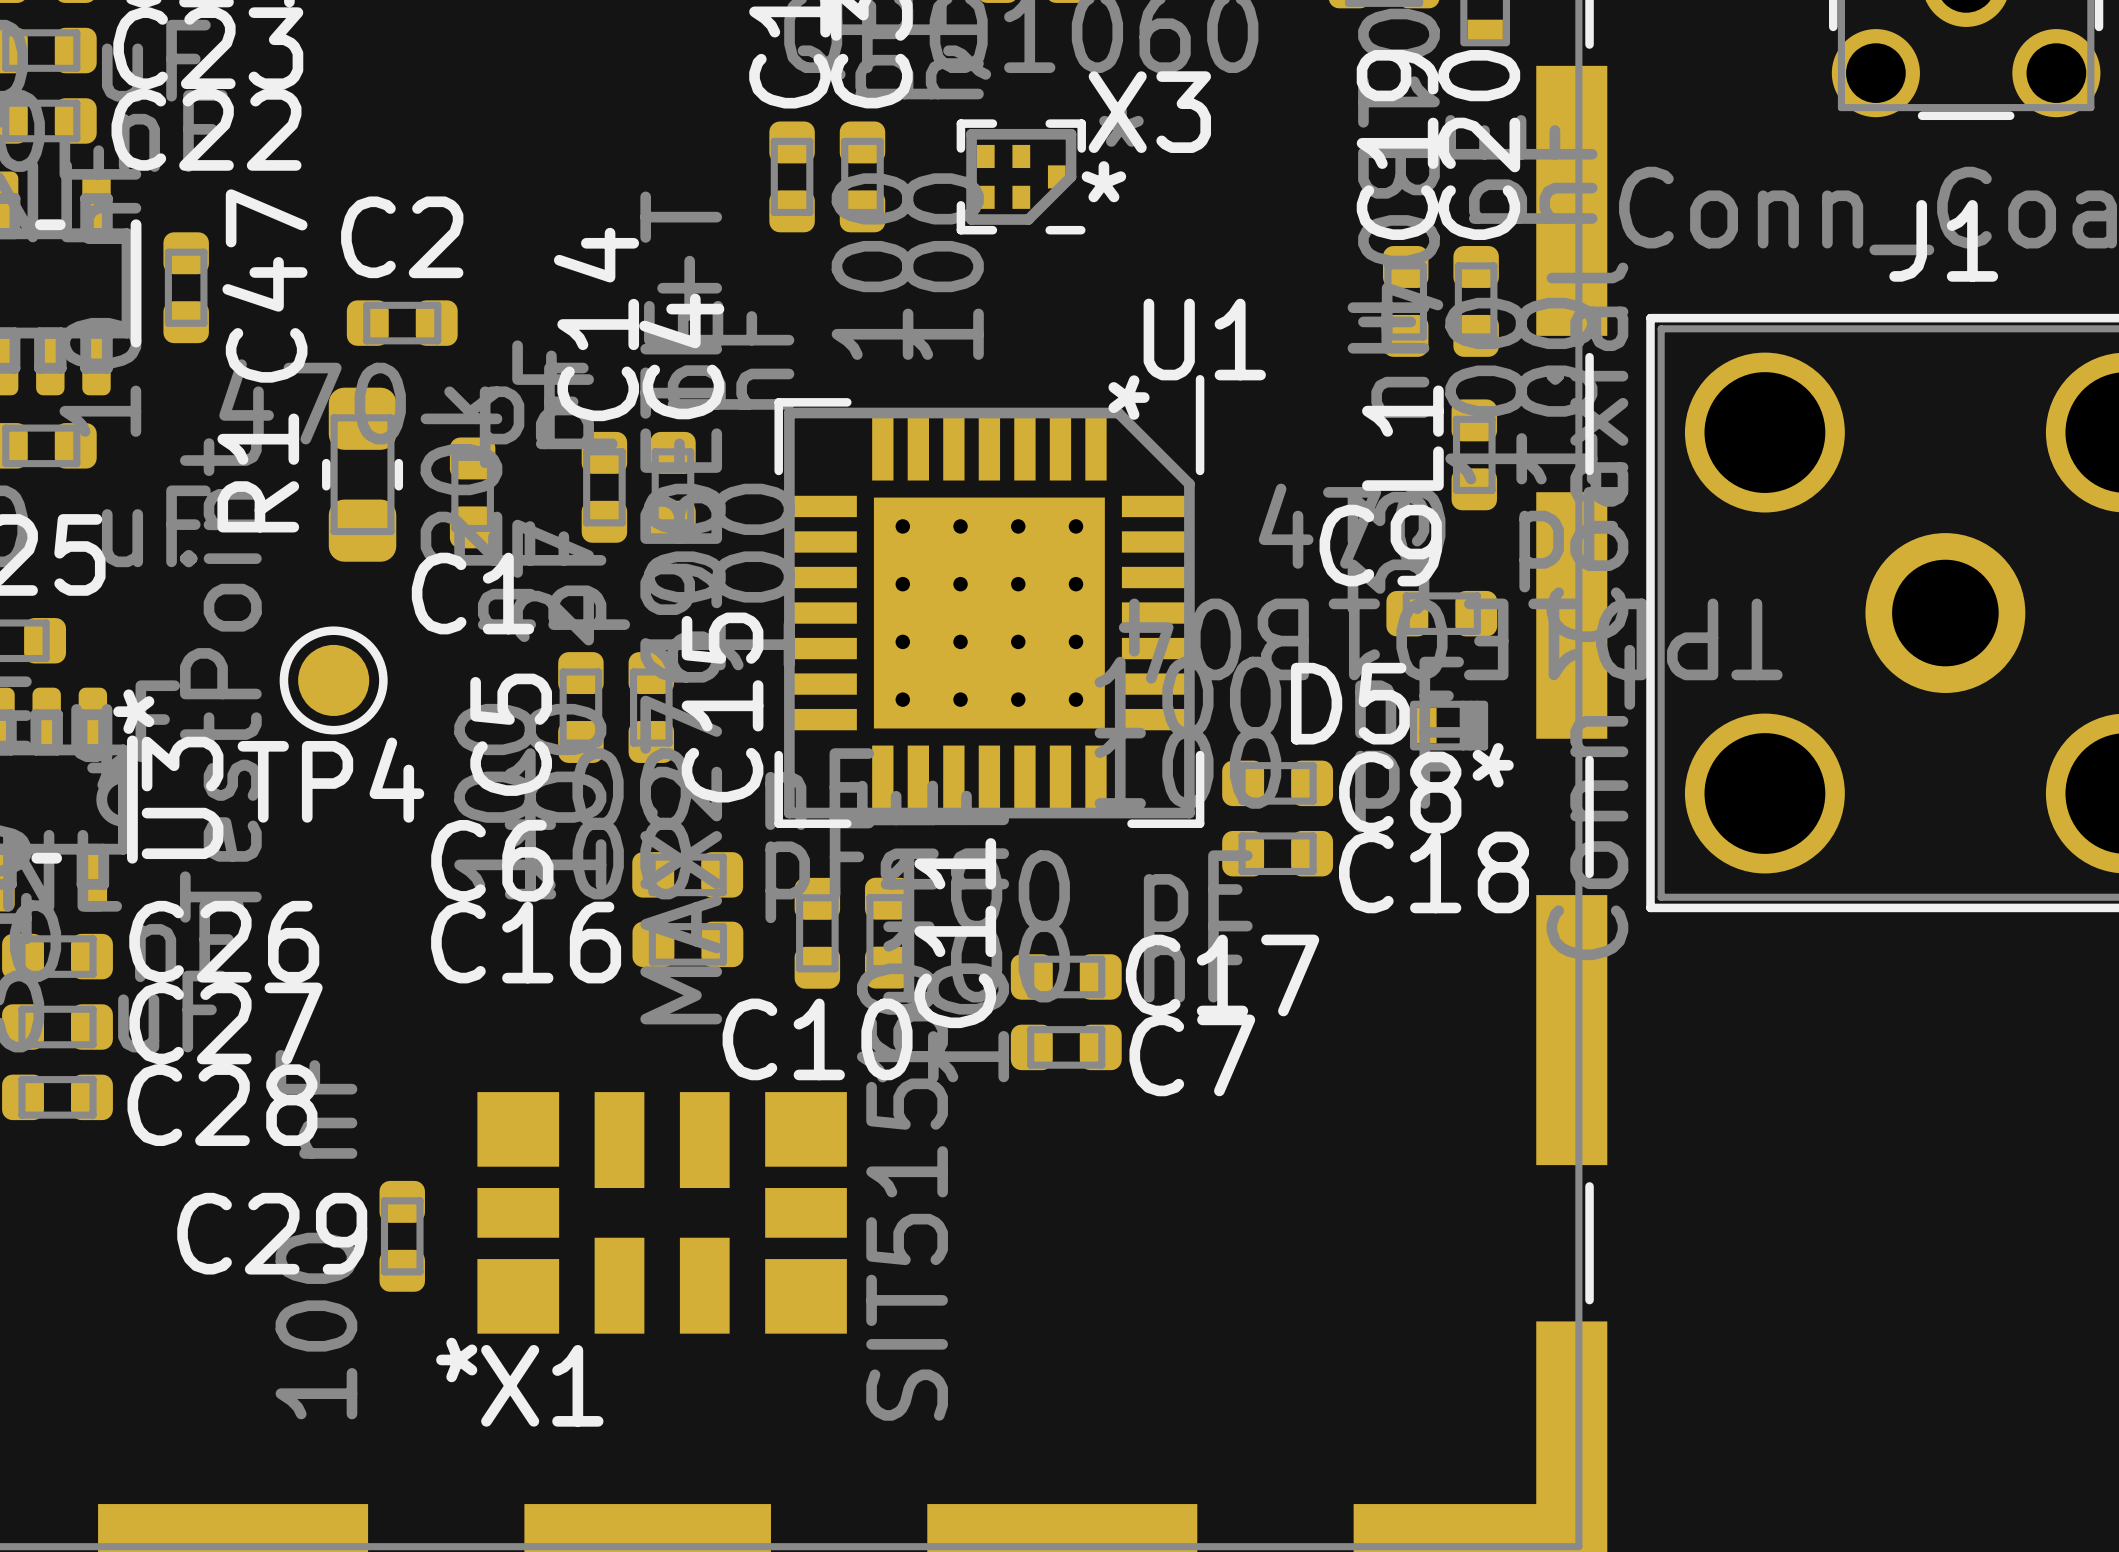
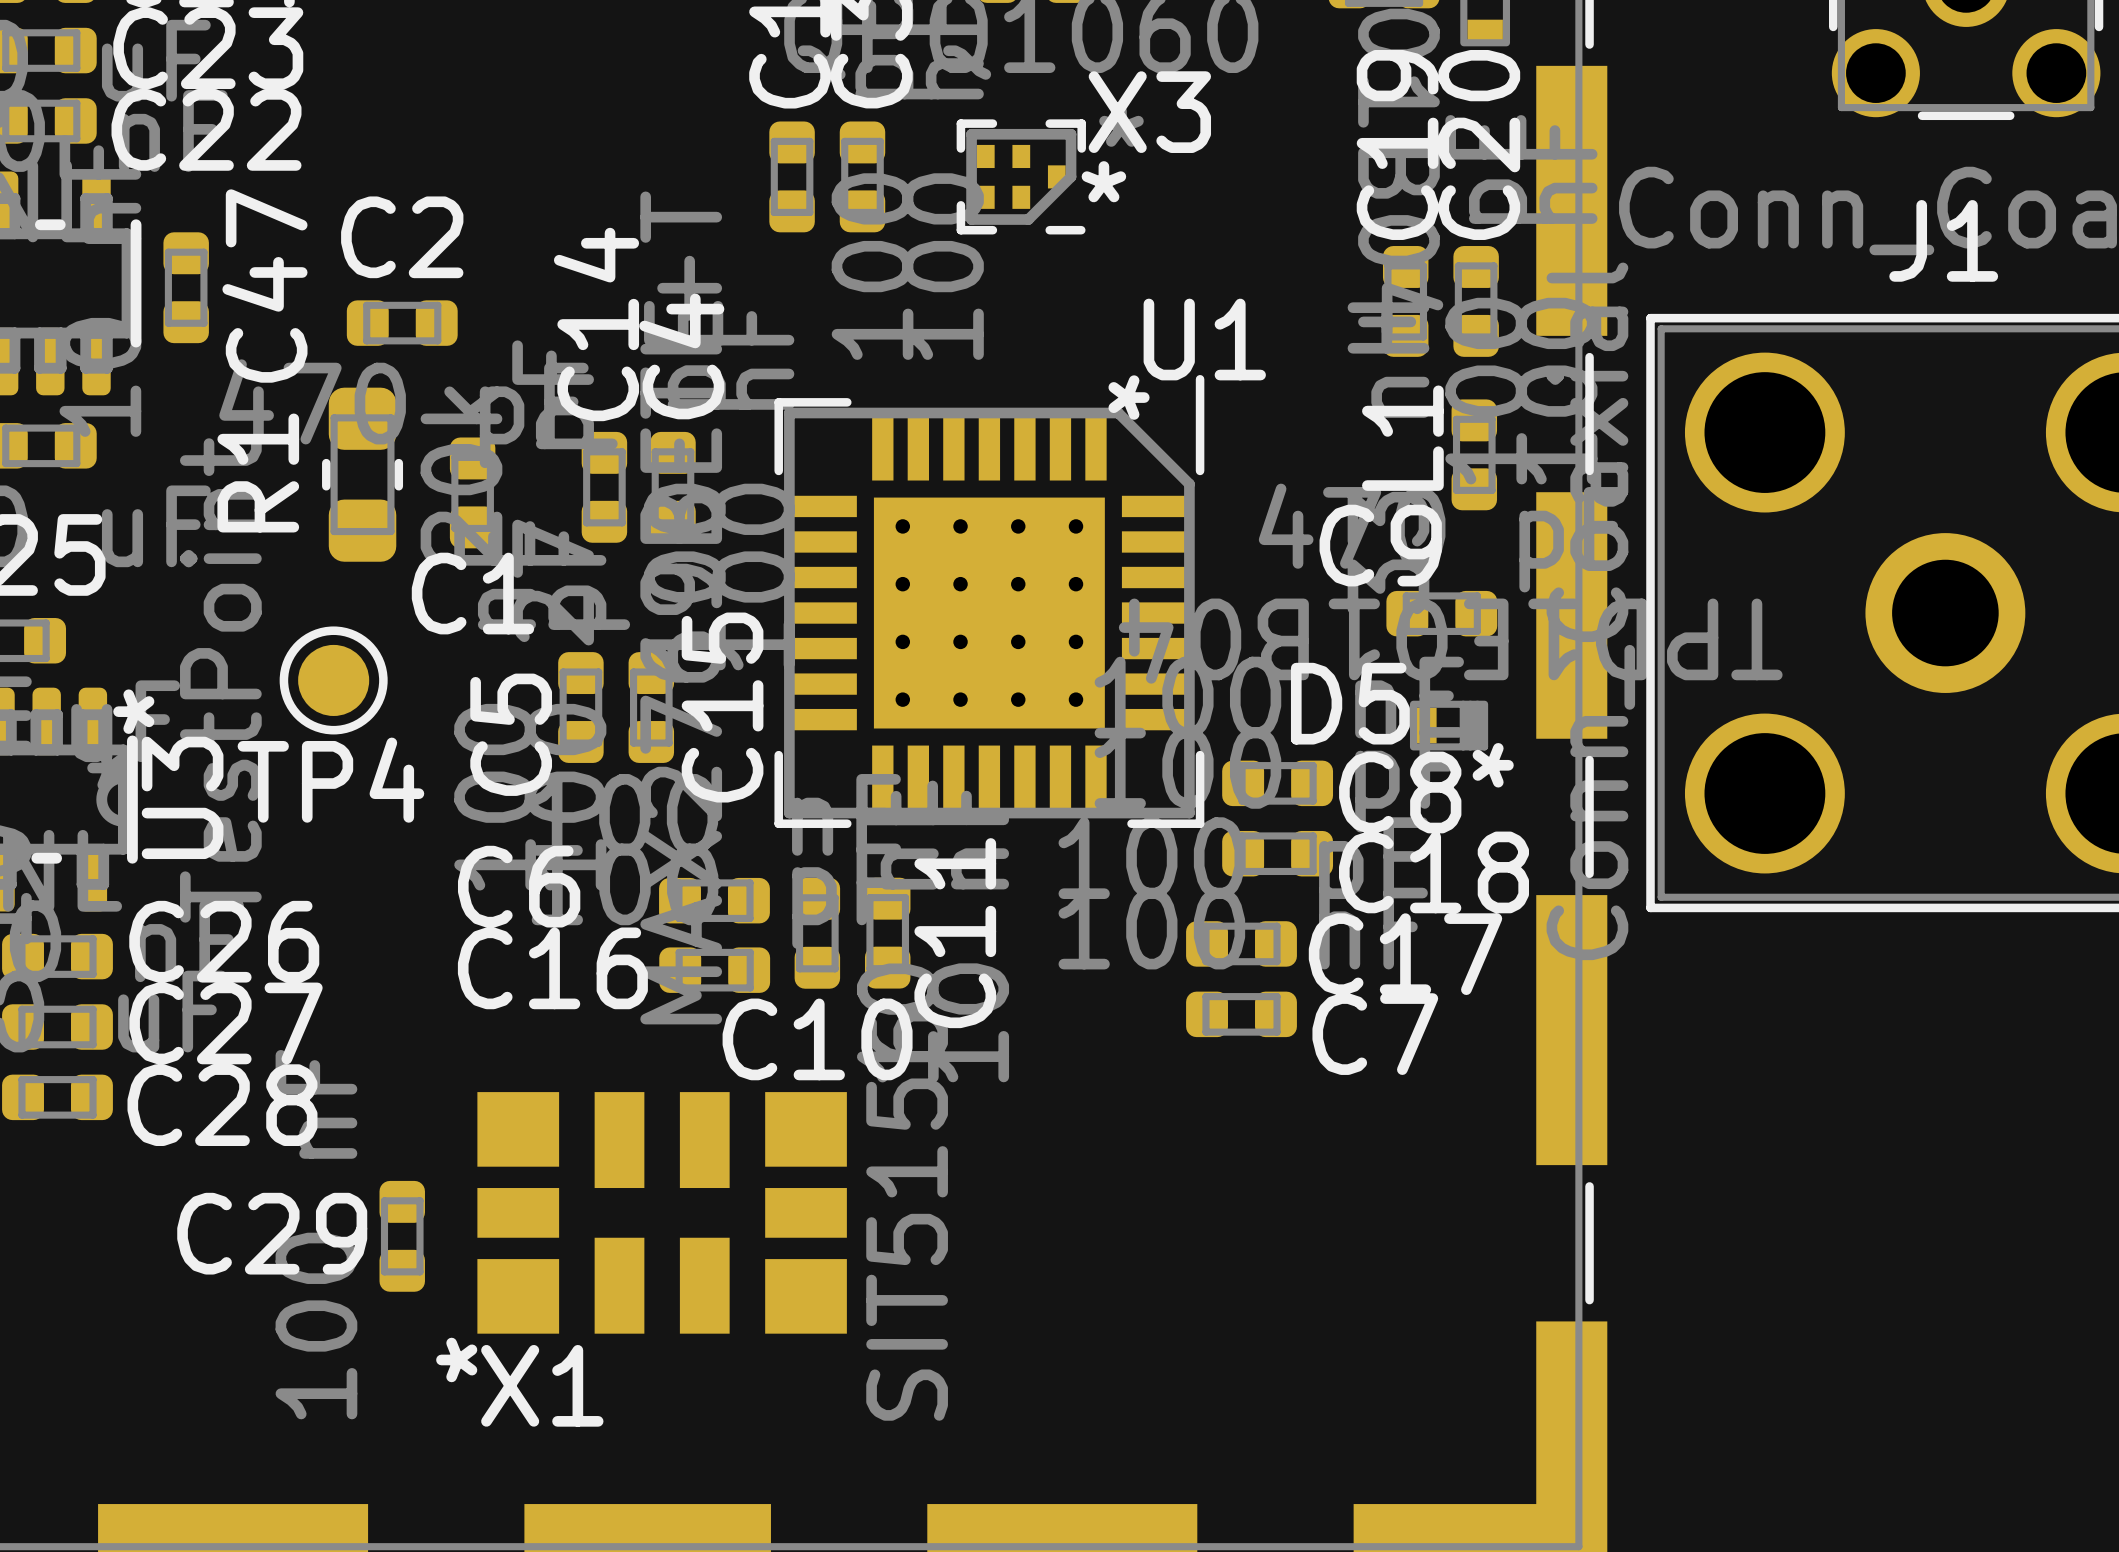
C6 position: (687, 874) -> (714, 900)
C16 position: (687, 944) -> (714, 970)
C17 name position: C17 (1222, 975) -> C17 (1405, 954)
C17 position: (1066, 976) -> (1241, 943)
C7 position: (1066, 1047) -> (1241, 1014)
C7 name position: C7 (1192, 1055) -> C7 (1375, 1034)

